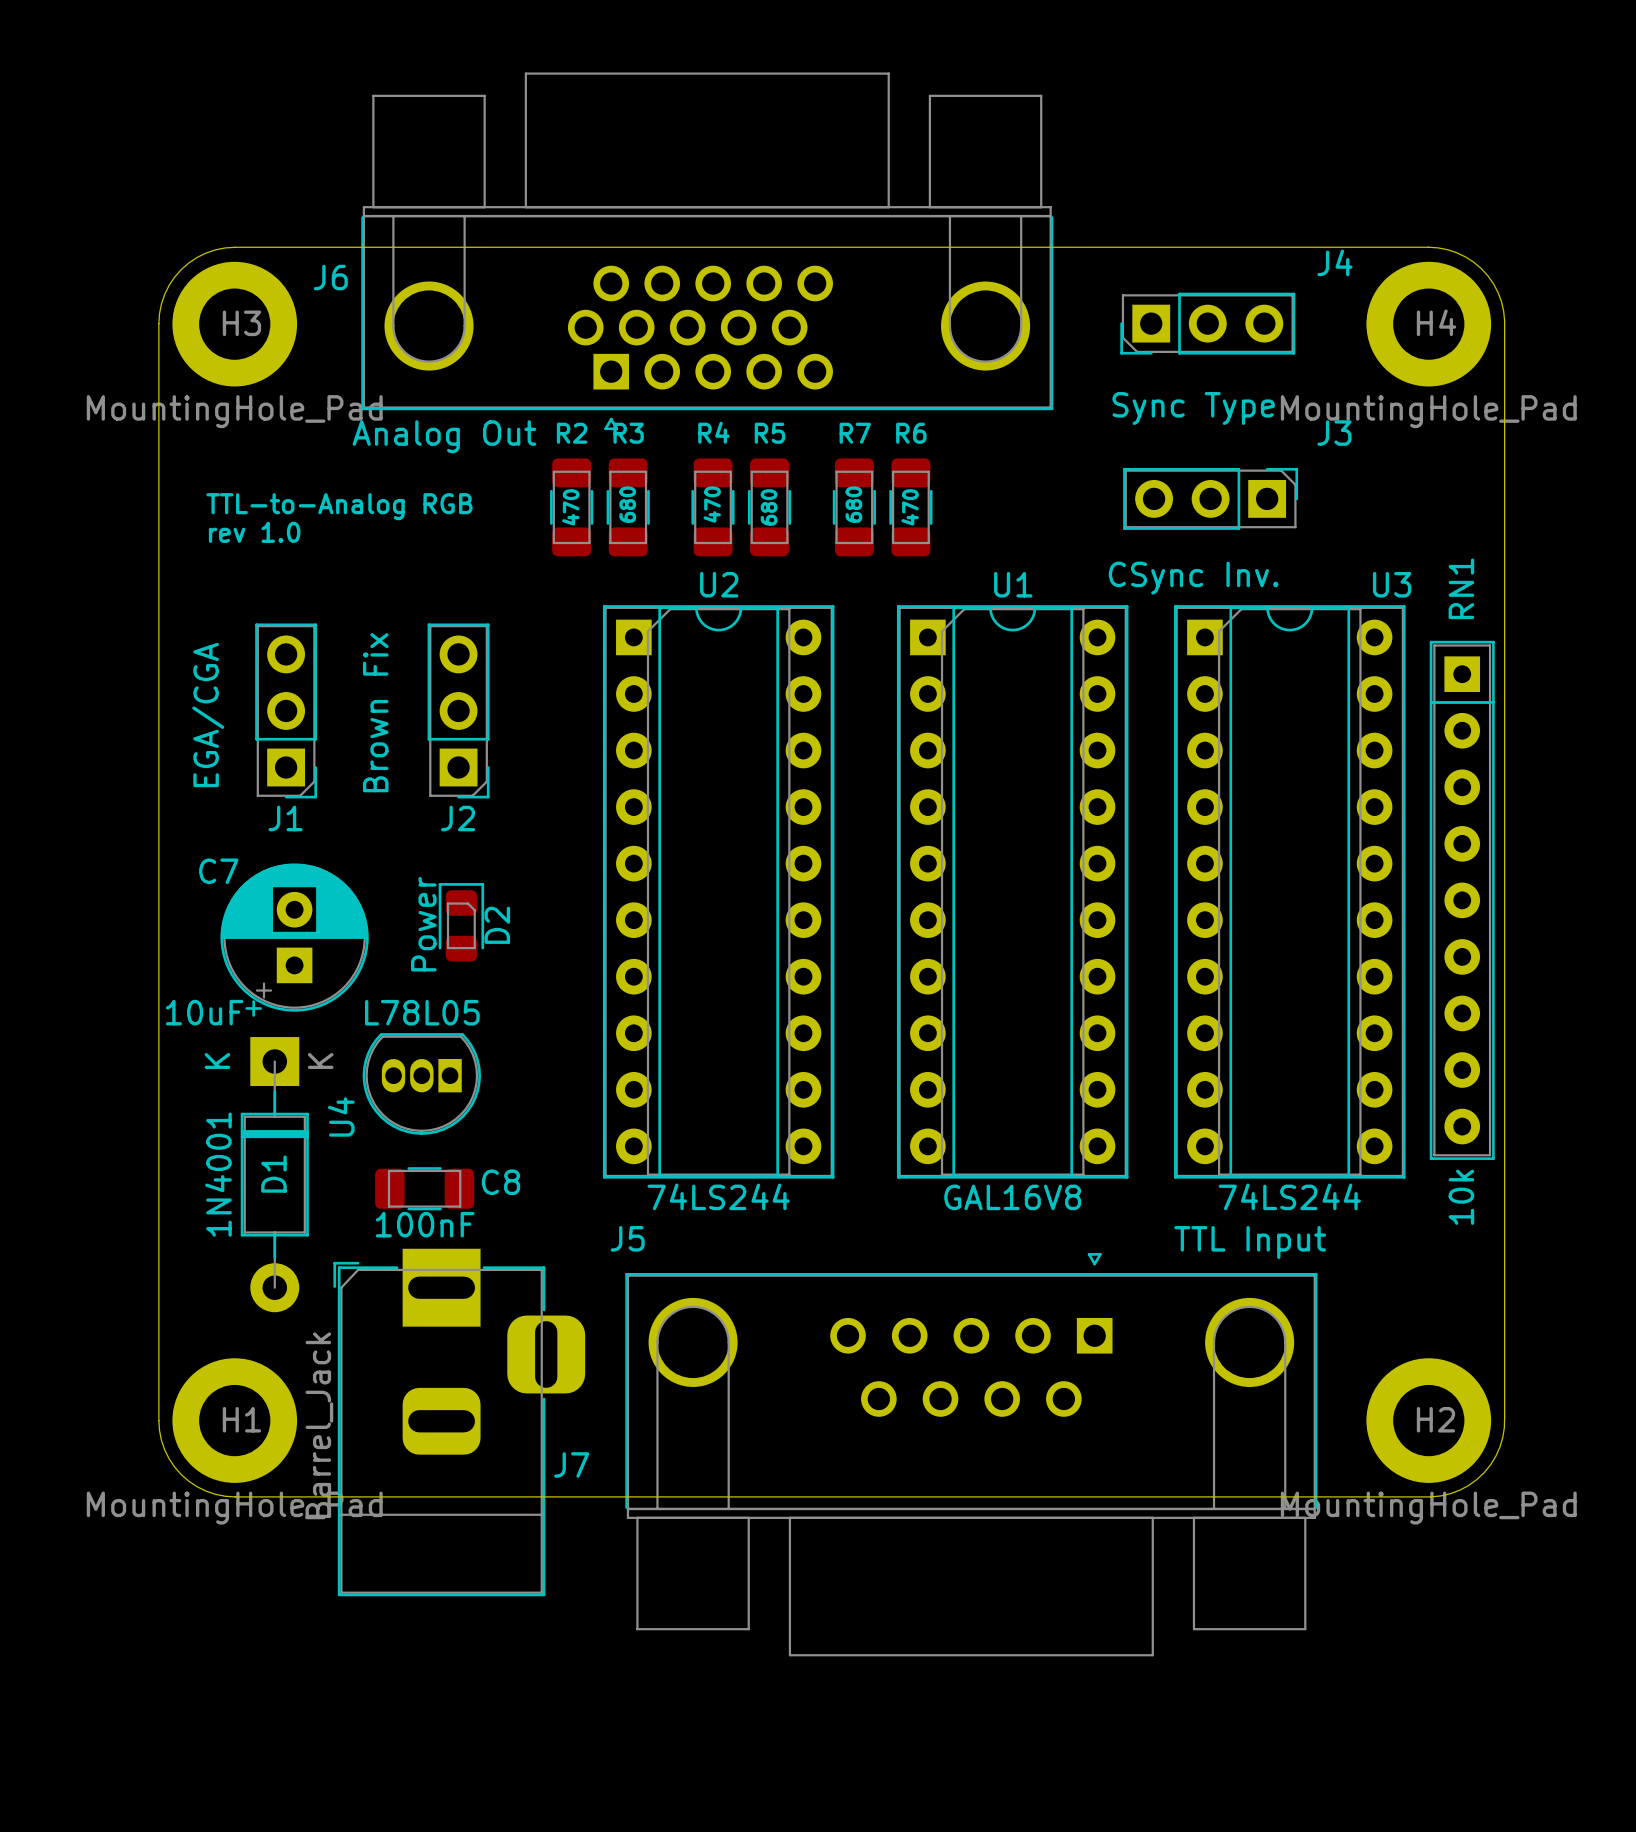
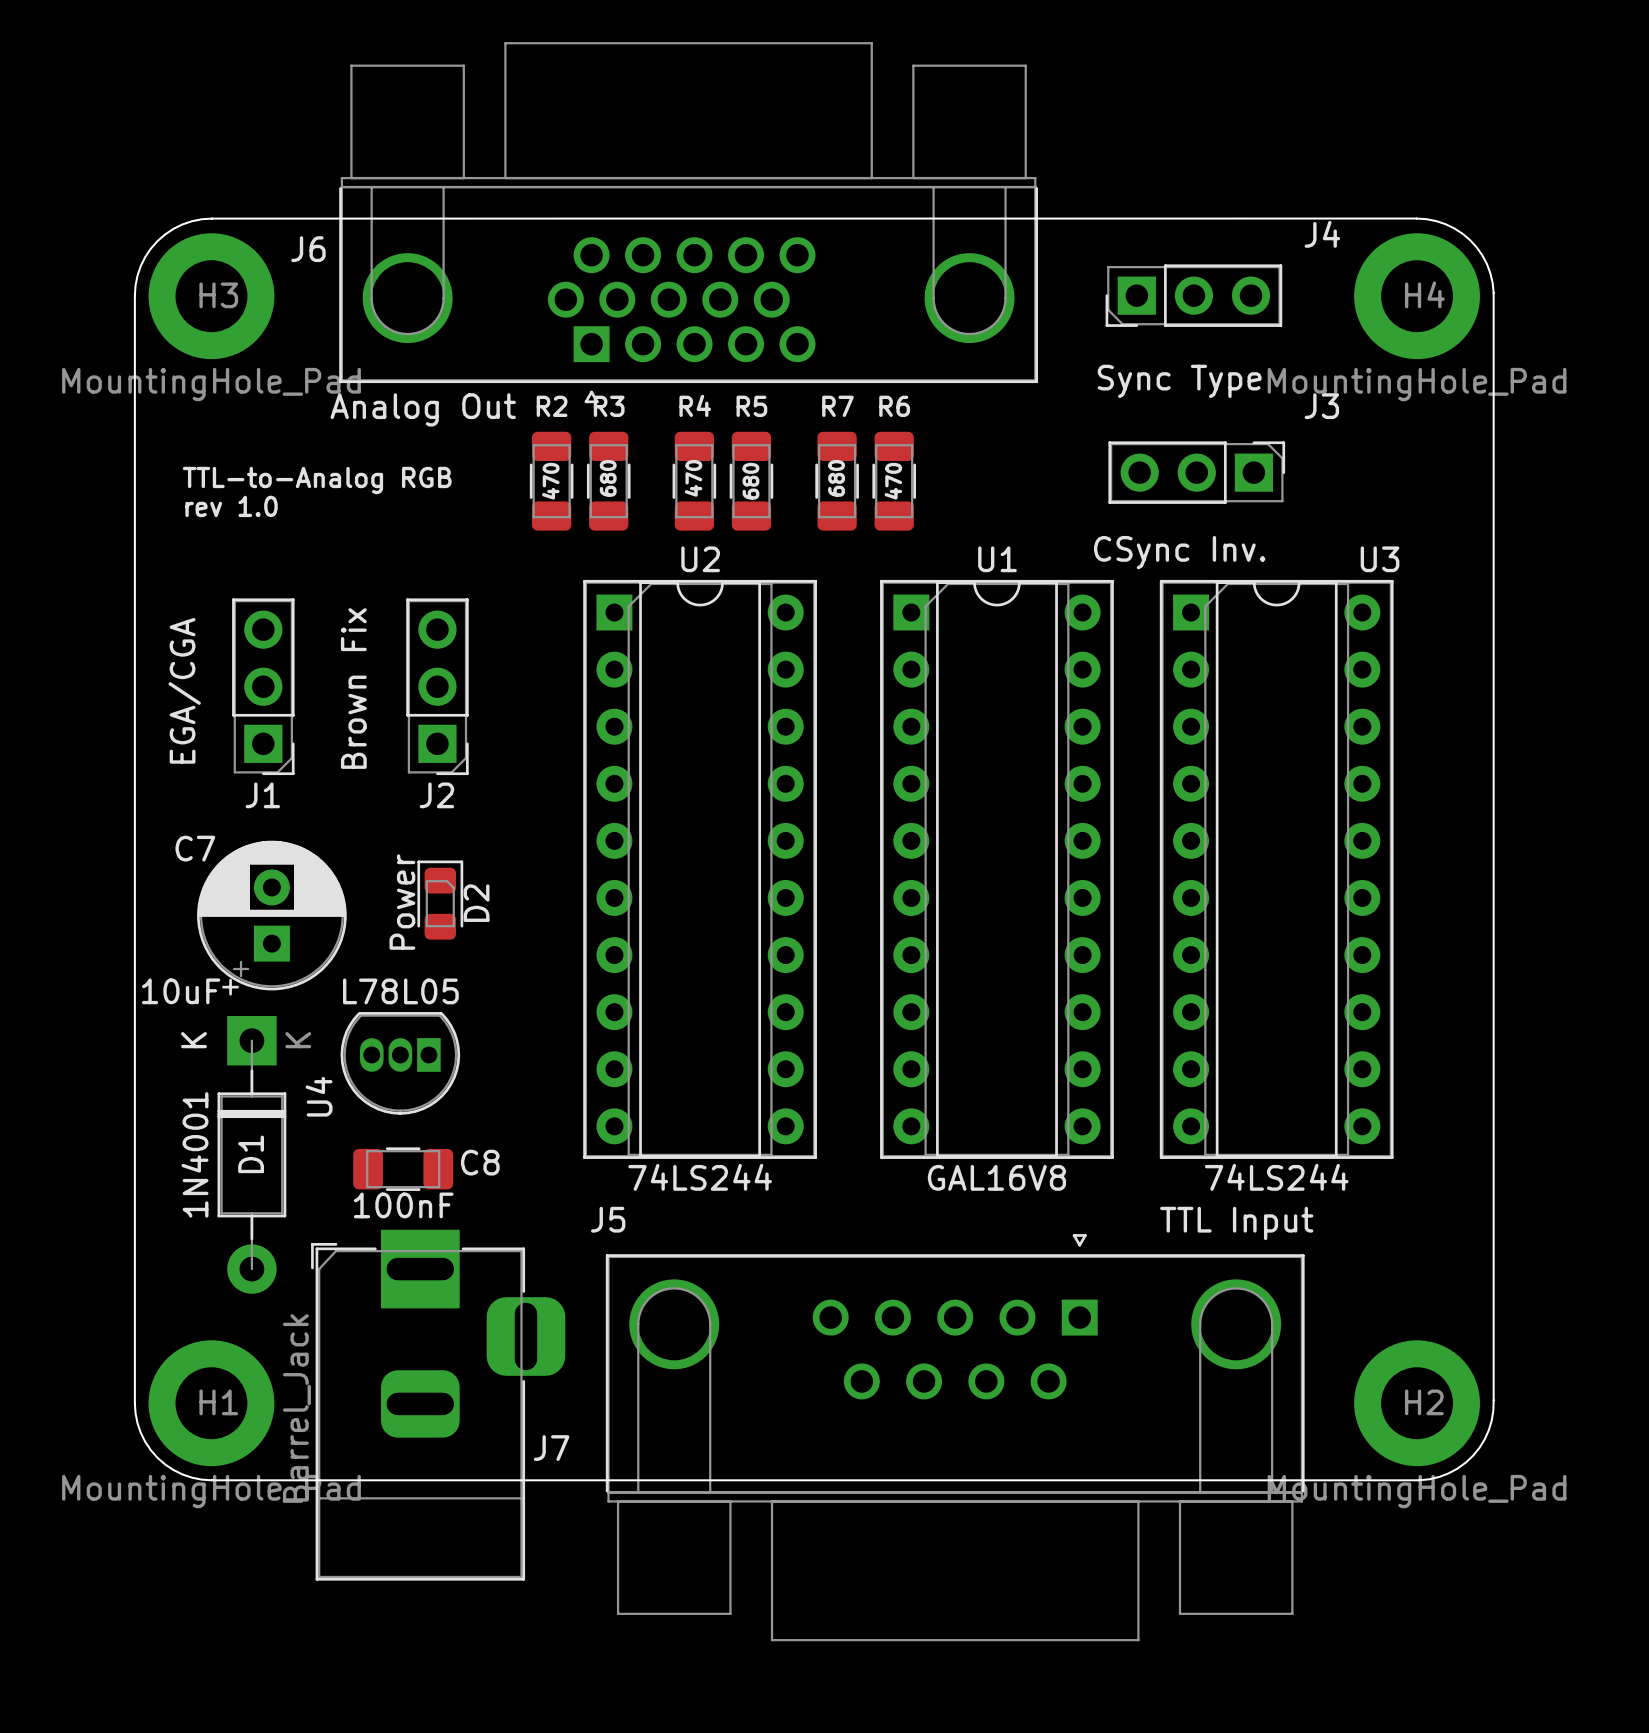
RN1: 10k (1462, 900) -> none

